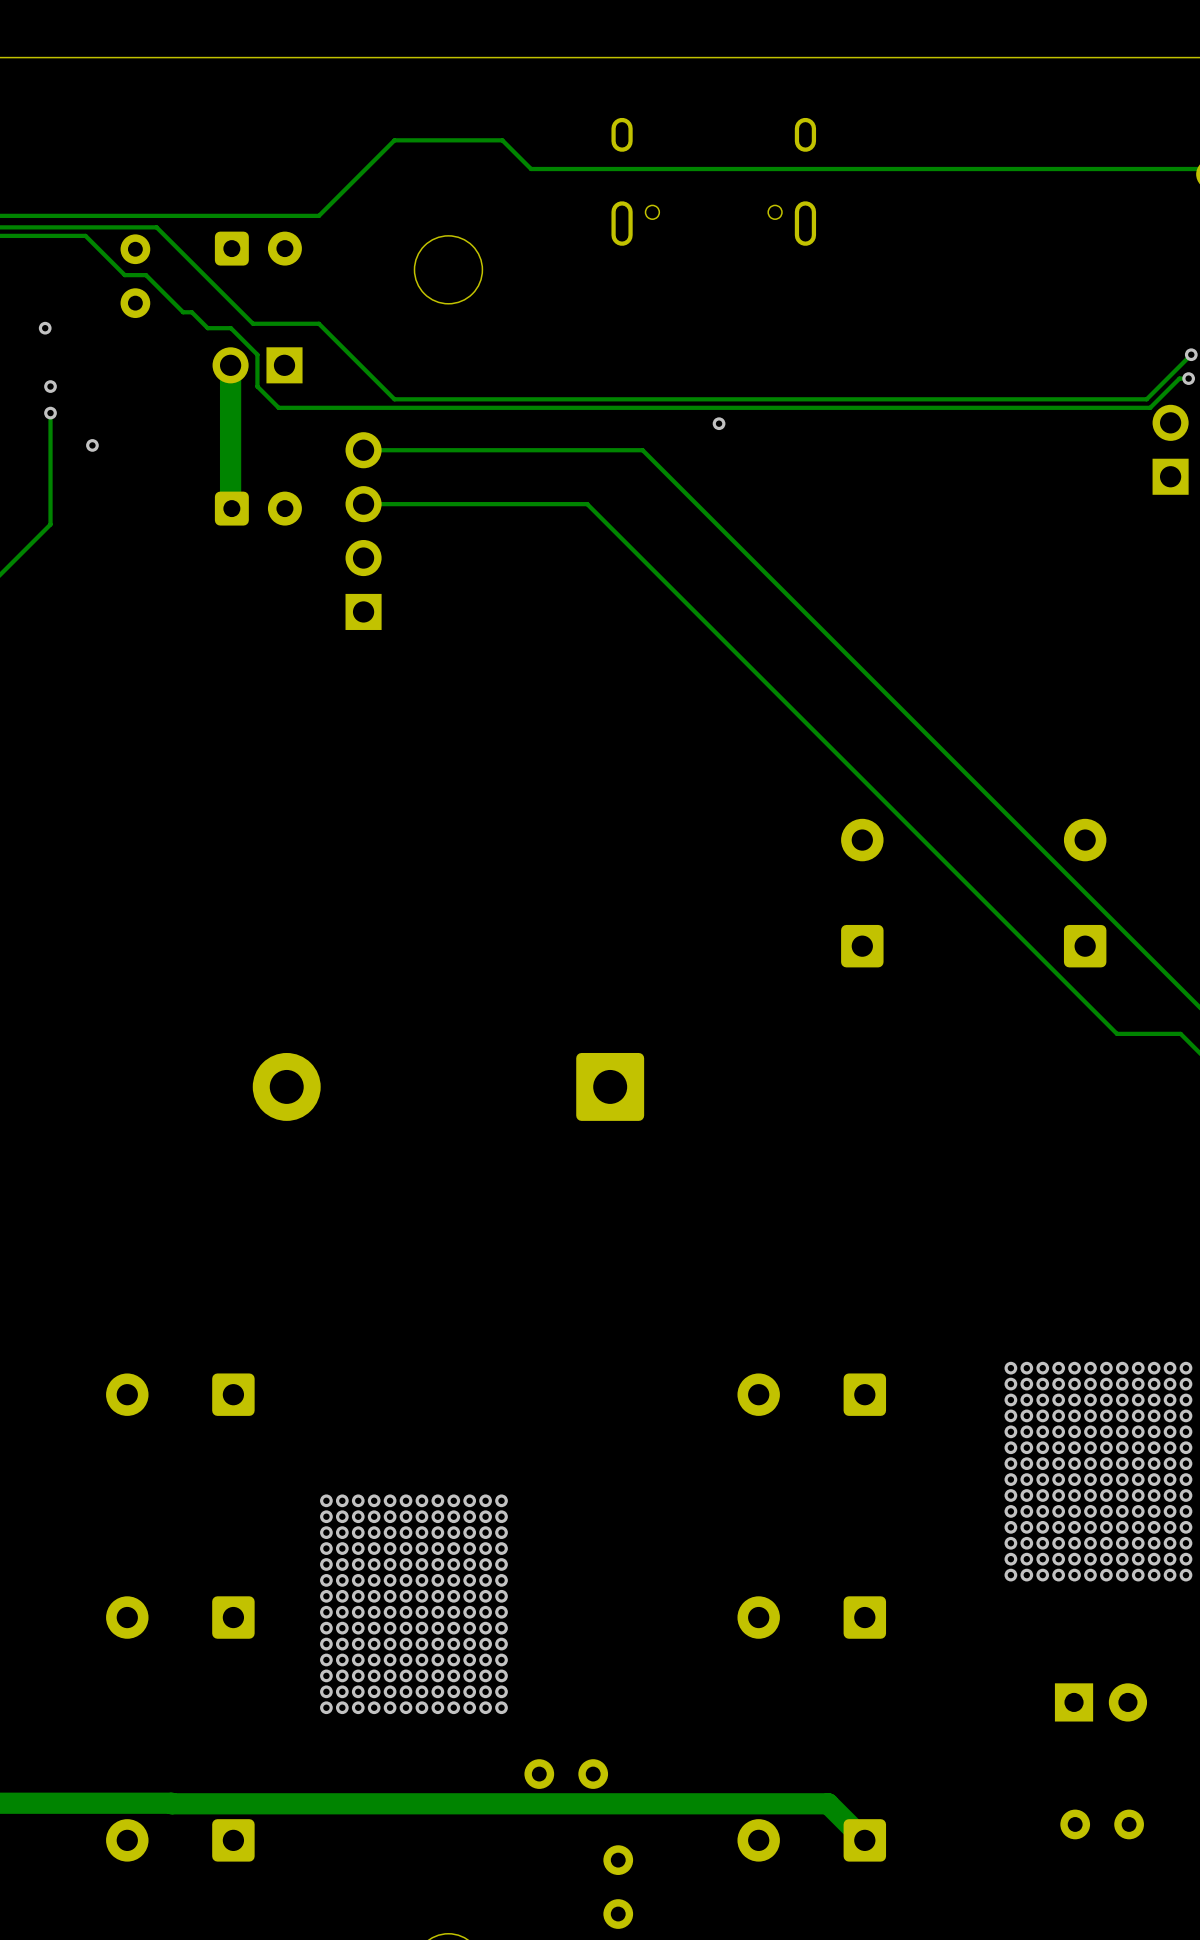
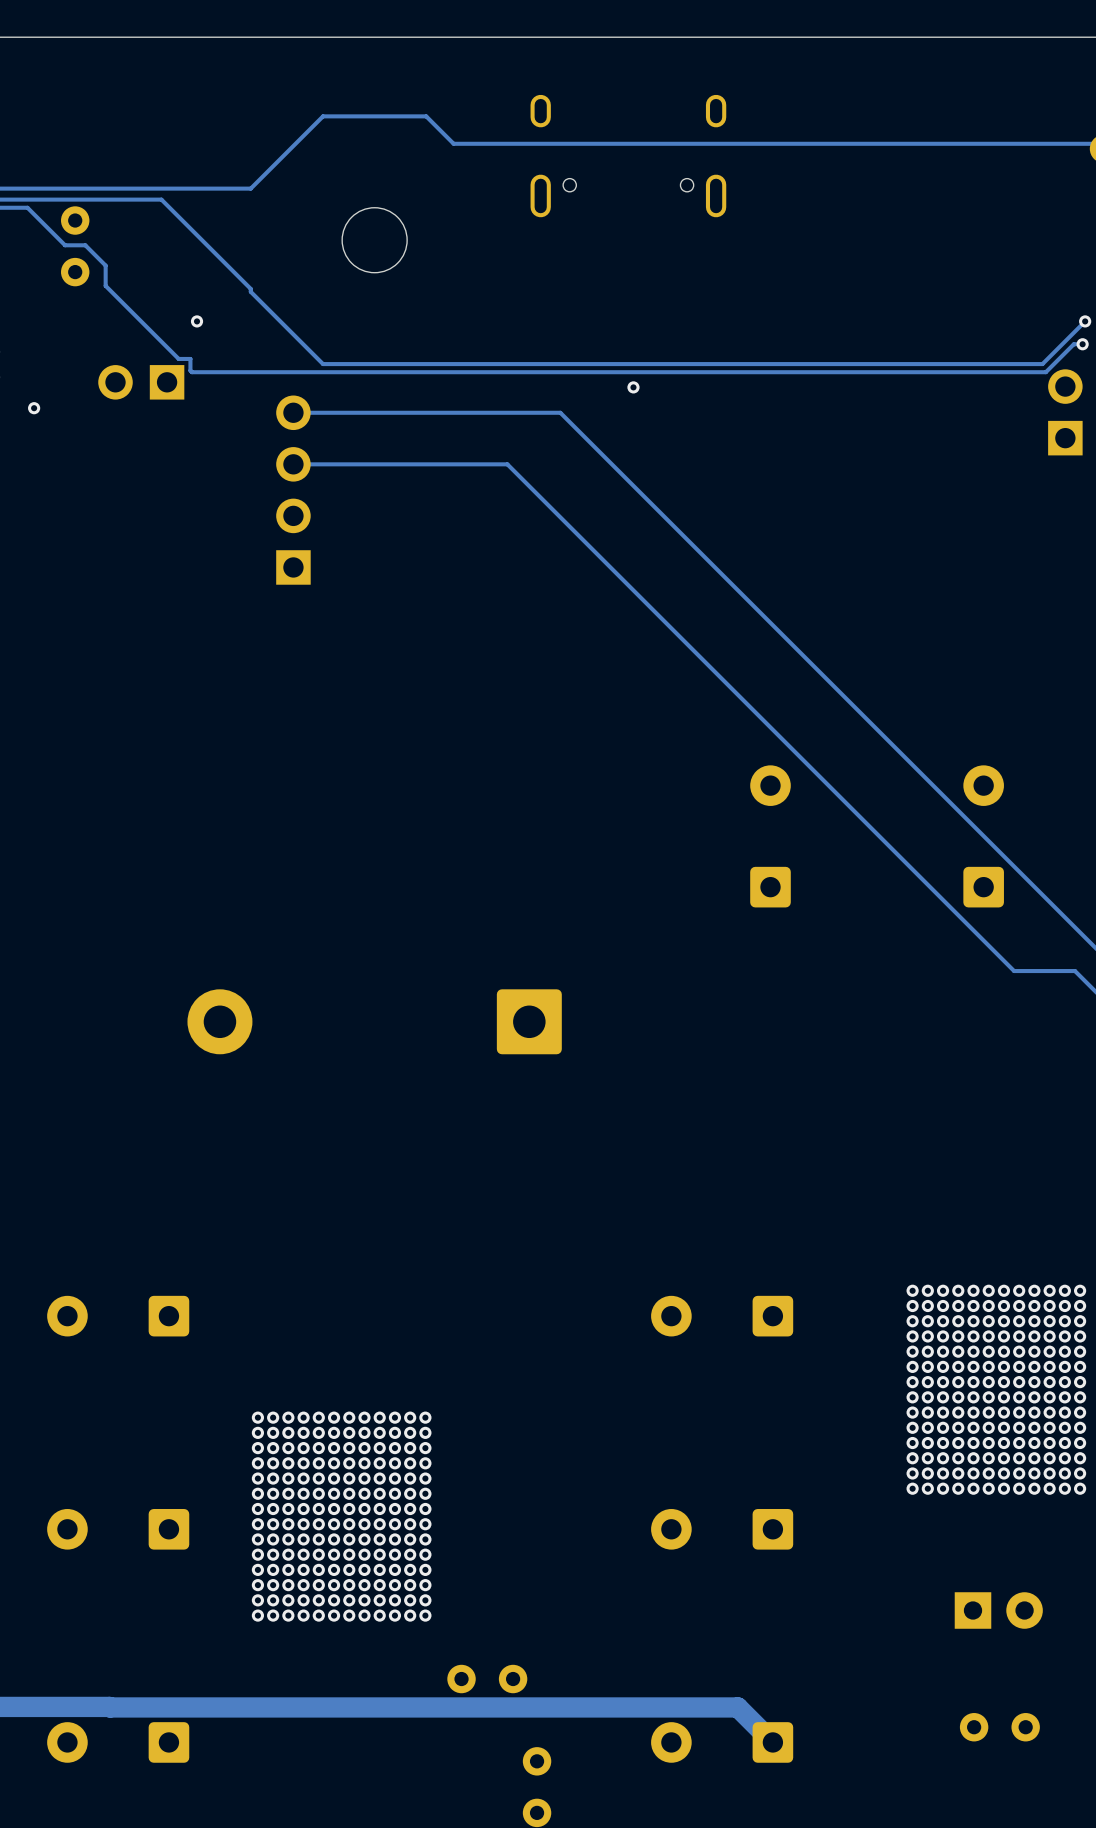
track: (156, 227) (253, 323) (318, 323) -> (95, 199) (161, 199) (250, 288) (250, 291)
part: (258, 248) -> none
track: (167, 296) (183, 312) (191, 312) (207, 328) (230, 328) (257, 354) (257, 386) (278, 407) -> (105, 265) (105, 285) (178, 358) (190, 358) (191, 372) (212, 372)
via: none -> (197, 321)
track: (230, 365) (231, 508) -> none
part position: (257, 365) -> (141, 382)
part: (258, 508) -> none

